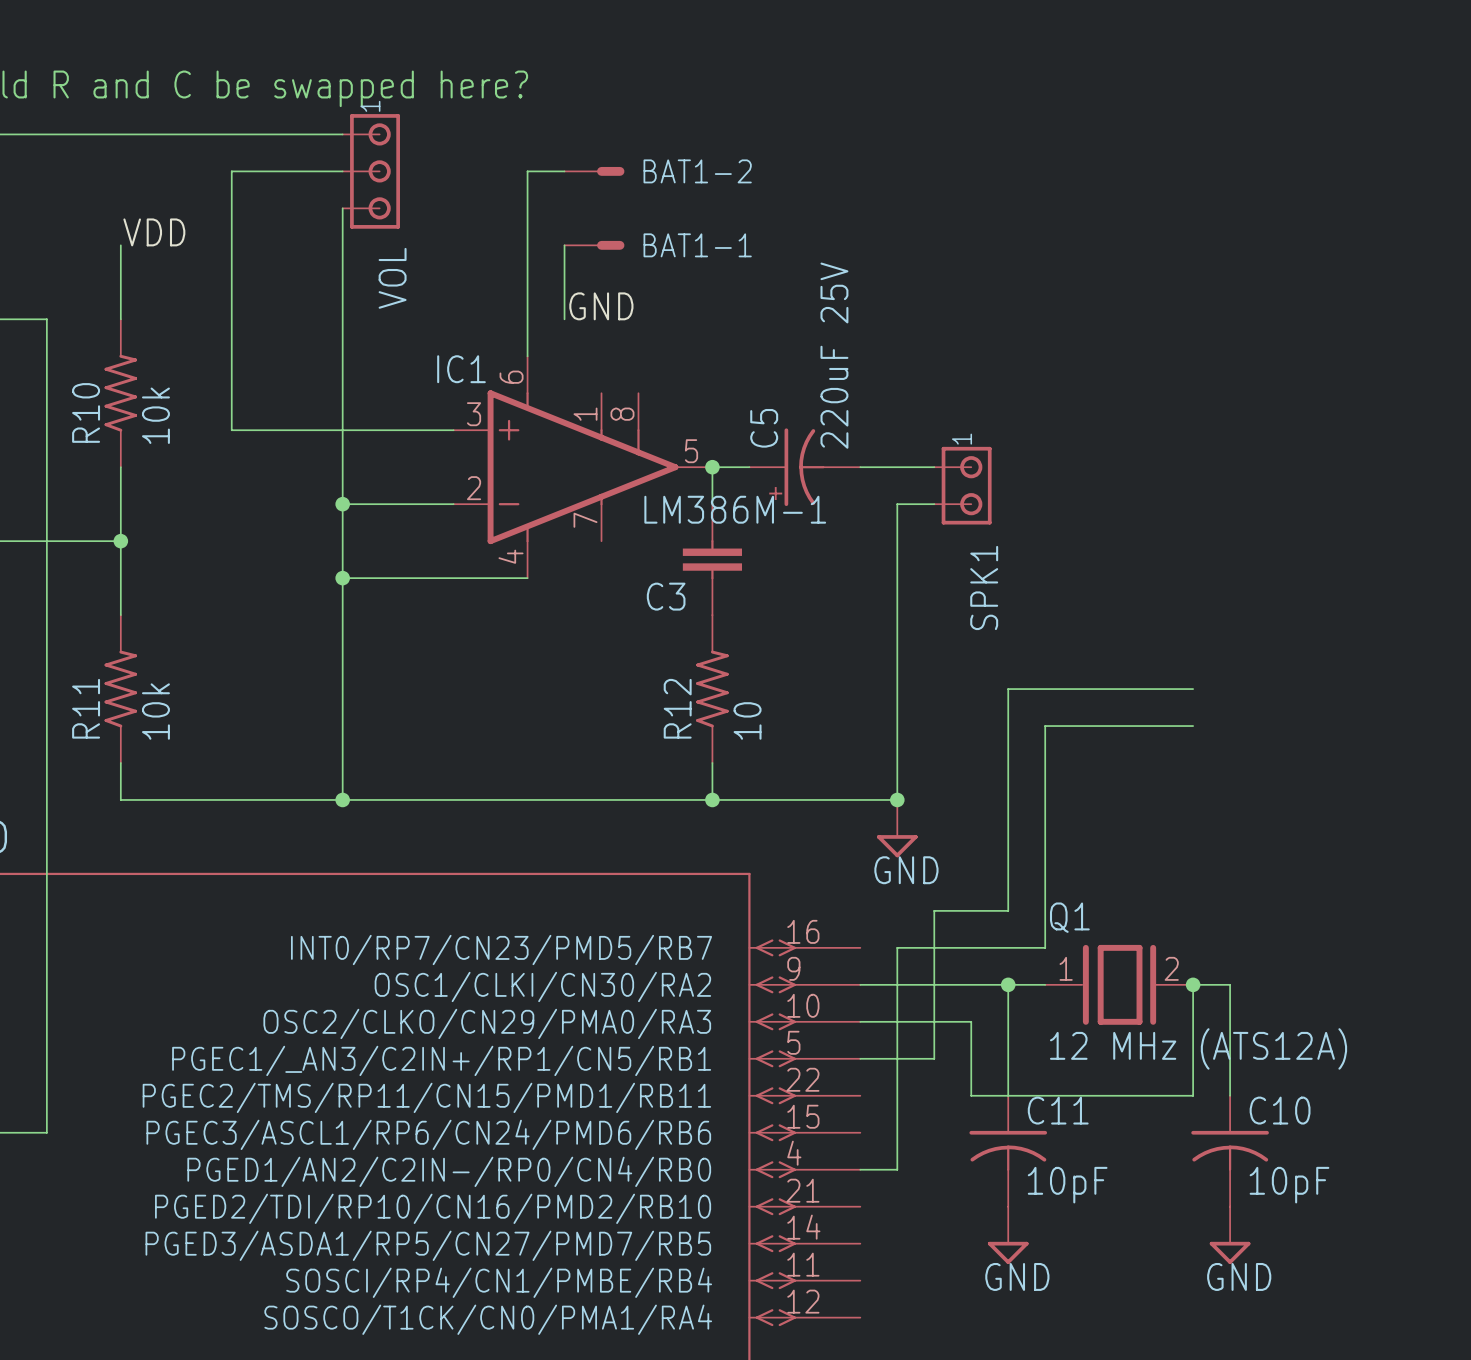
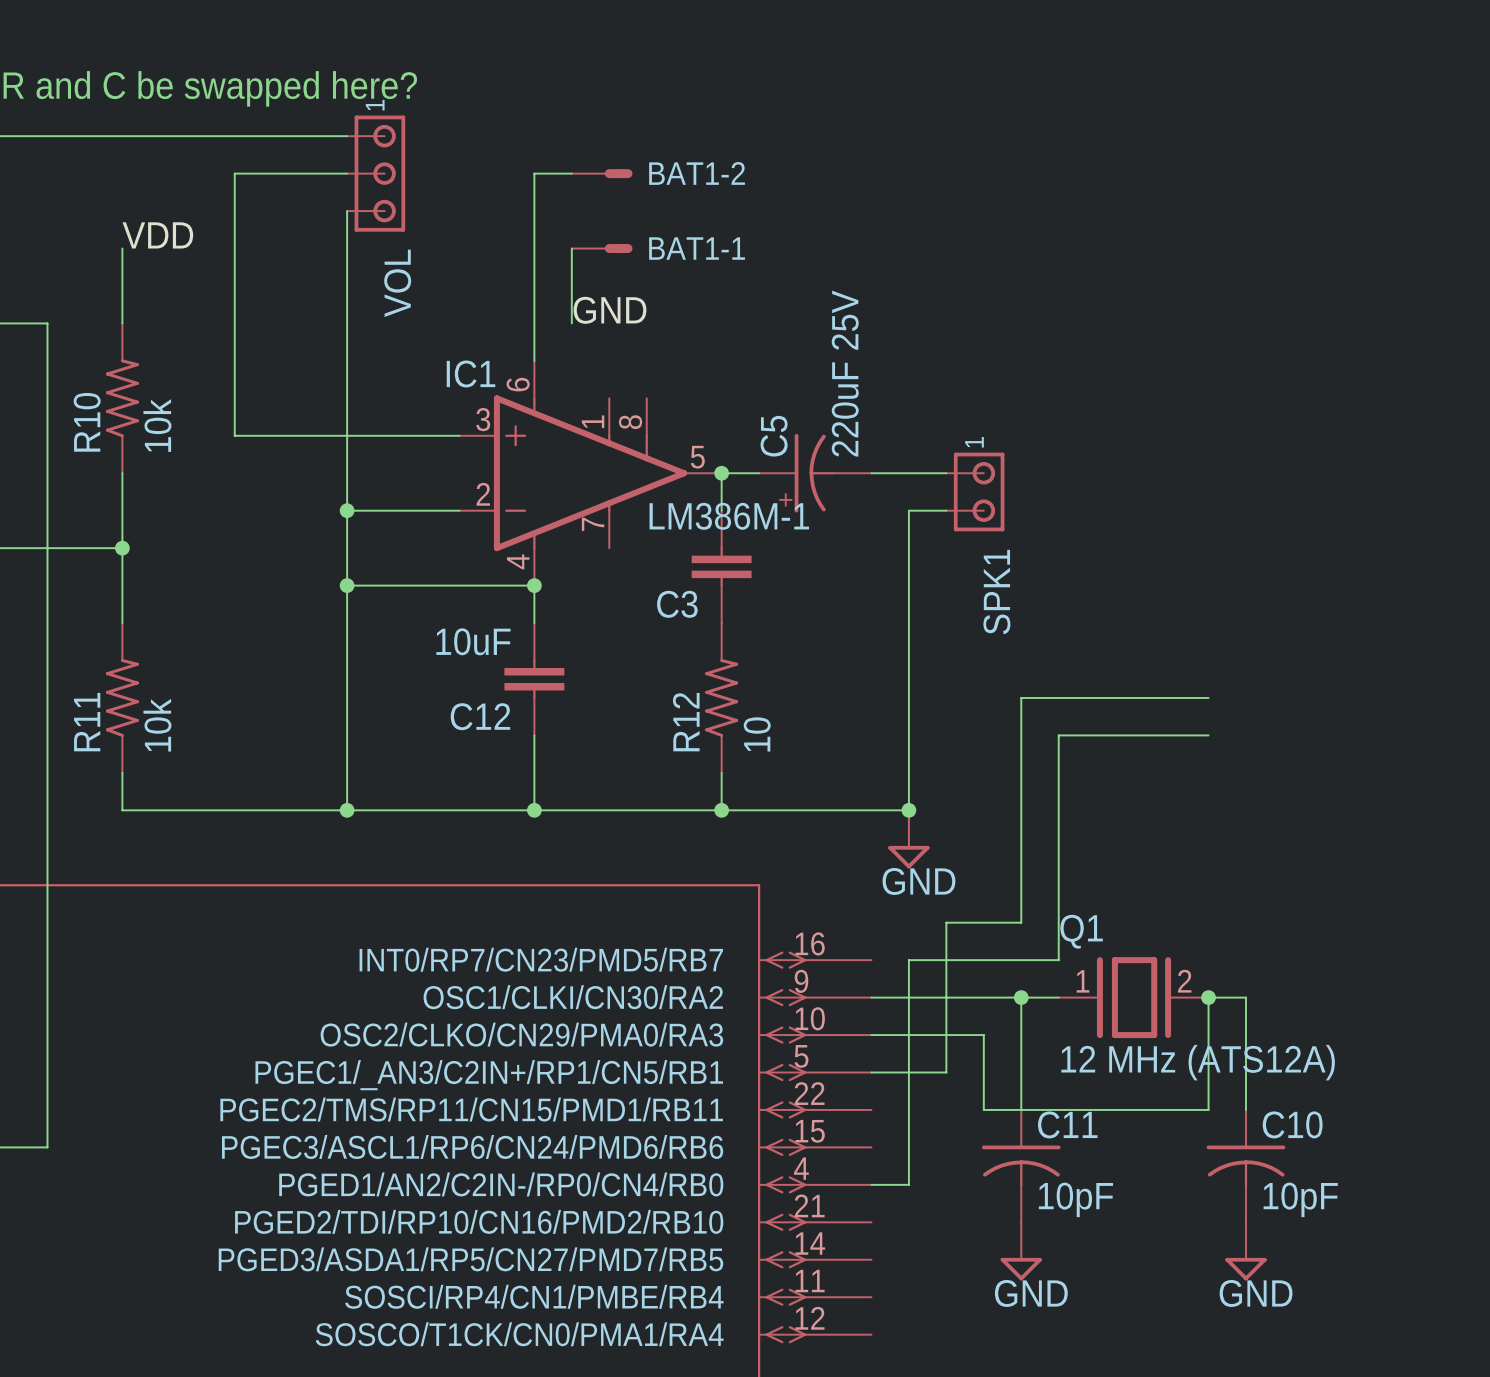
wire: none -> (534, 585) (534, 623)
junction: none -> (534, 585)
C12: none -> 10uF (534, 679)
wire: none -> (534, 735) (534, 810)
junction: none -> (534, 810)

